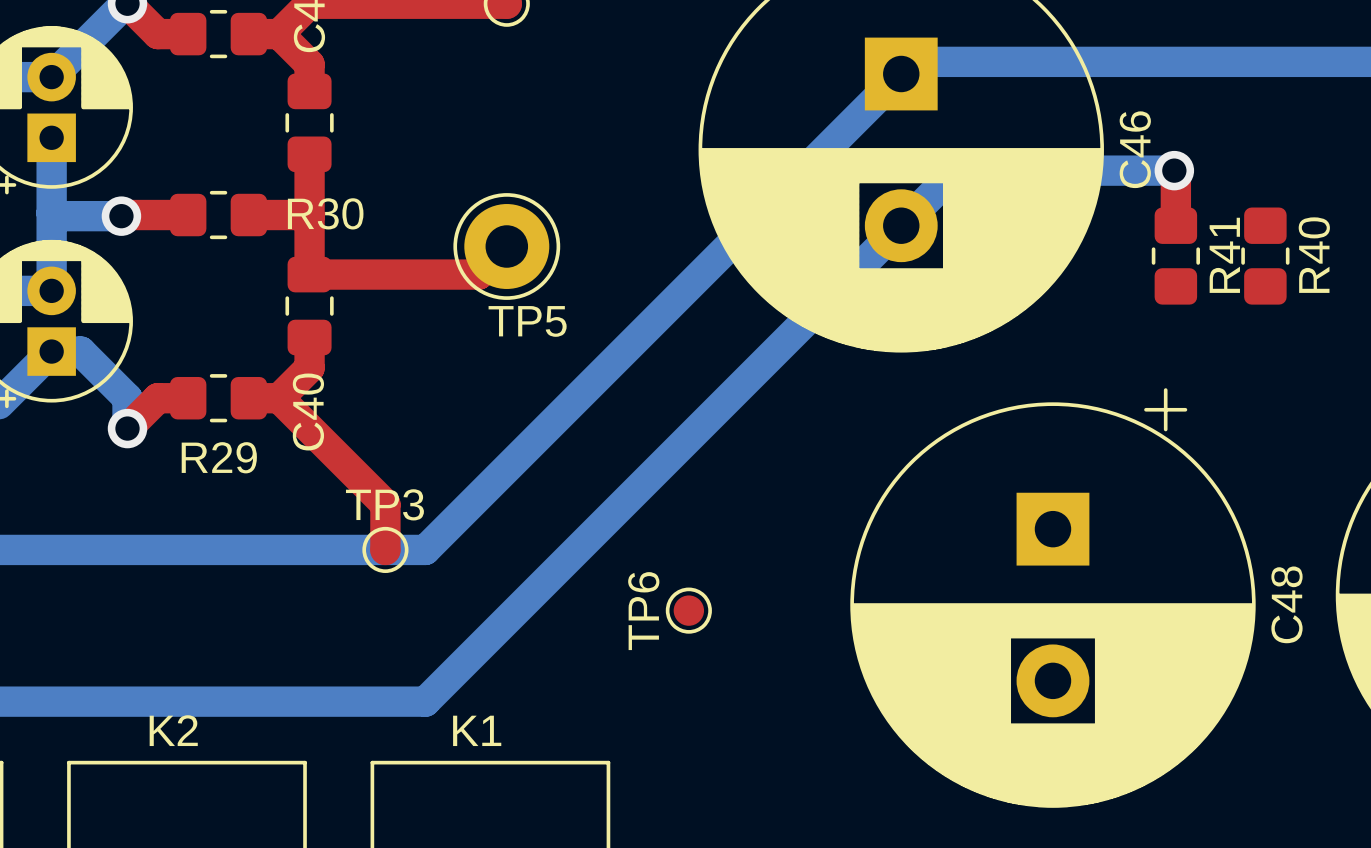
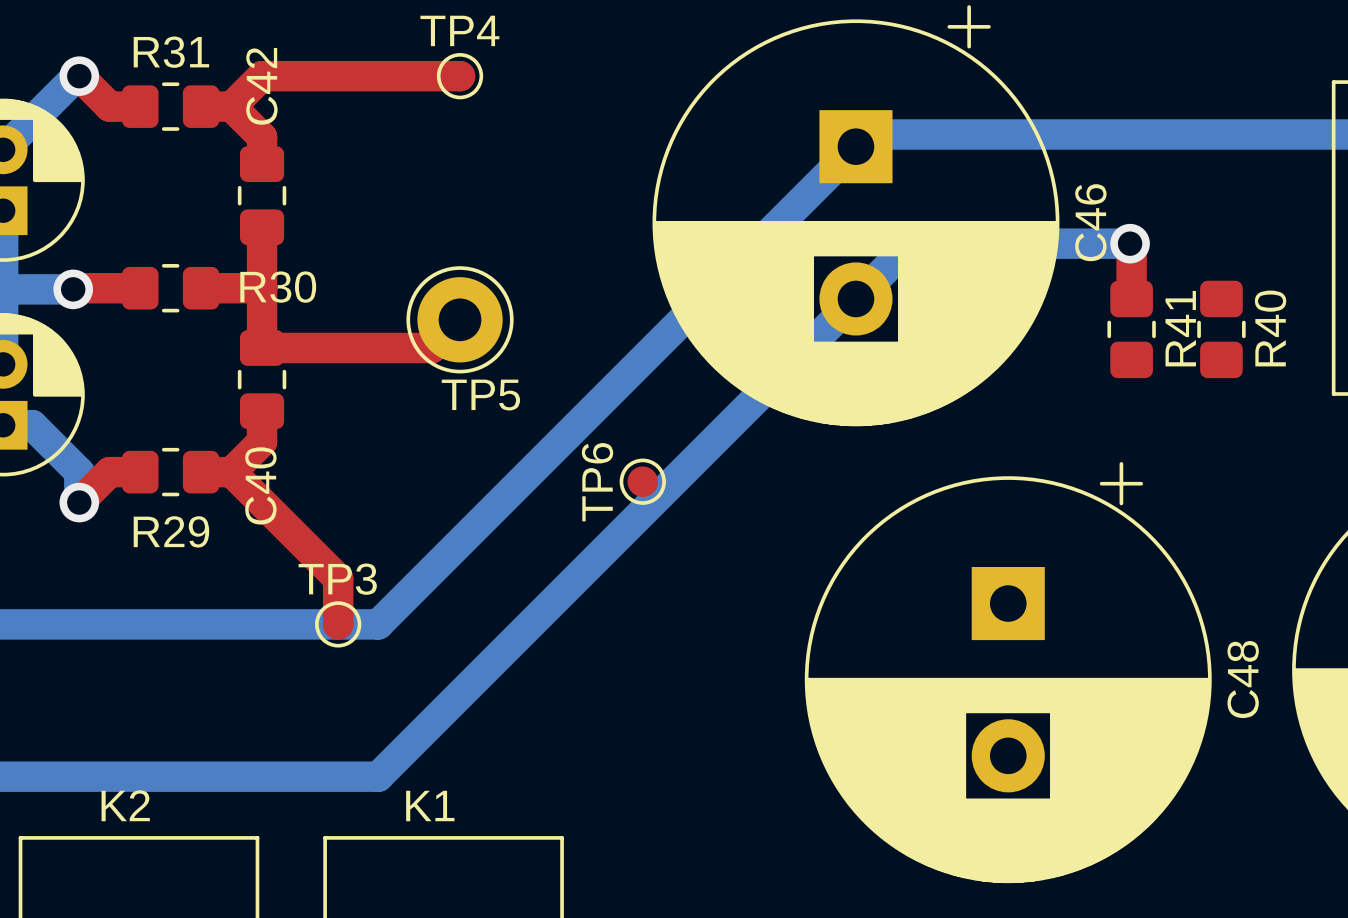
TP6 position: (688, 610) -> (642, 481)

